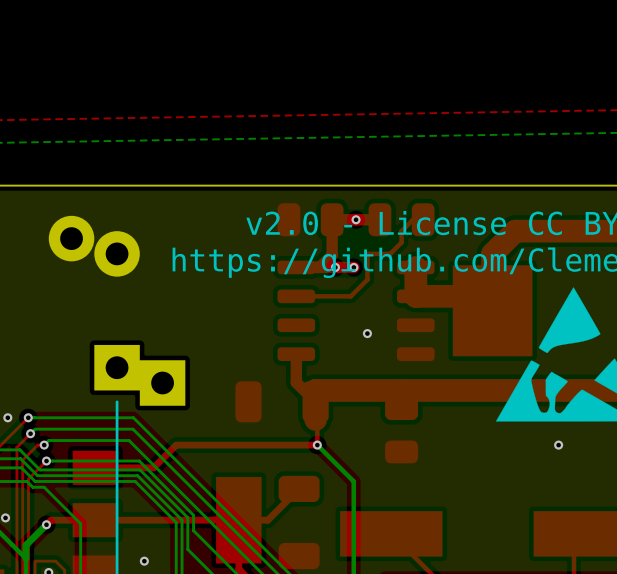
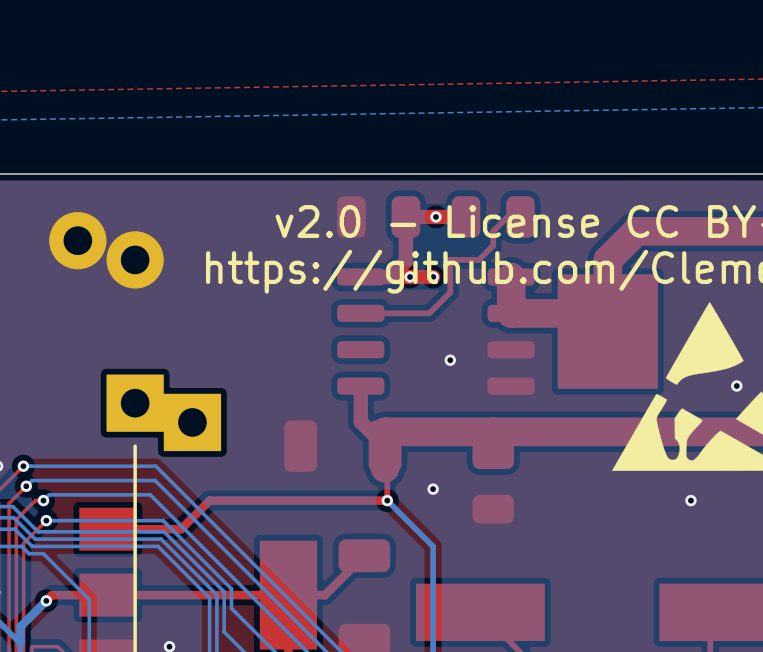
via: none -> (736, 385)
via: none -> (433, 489)

